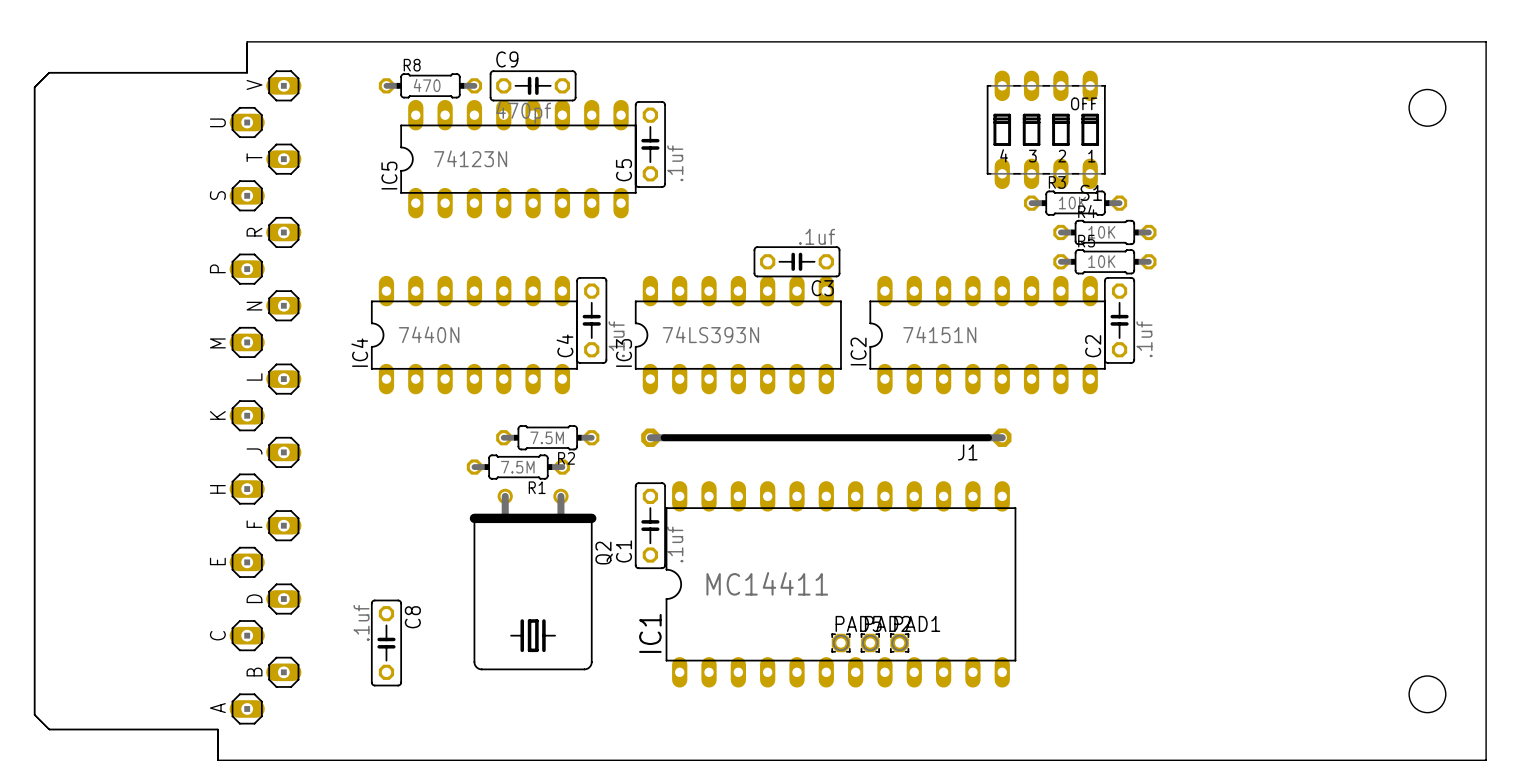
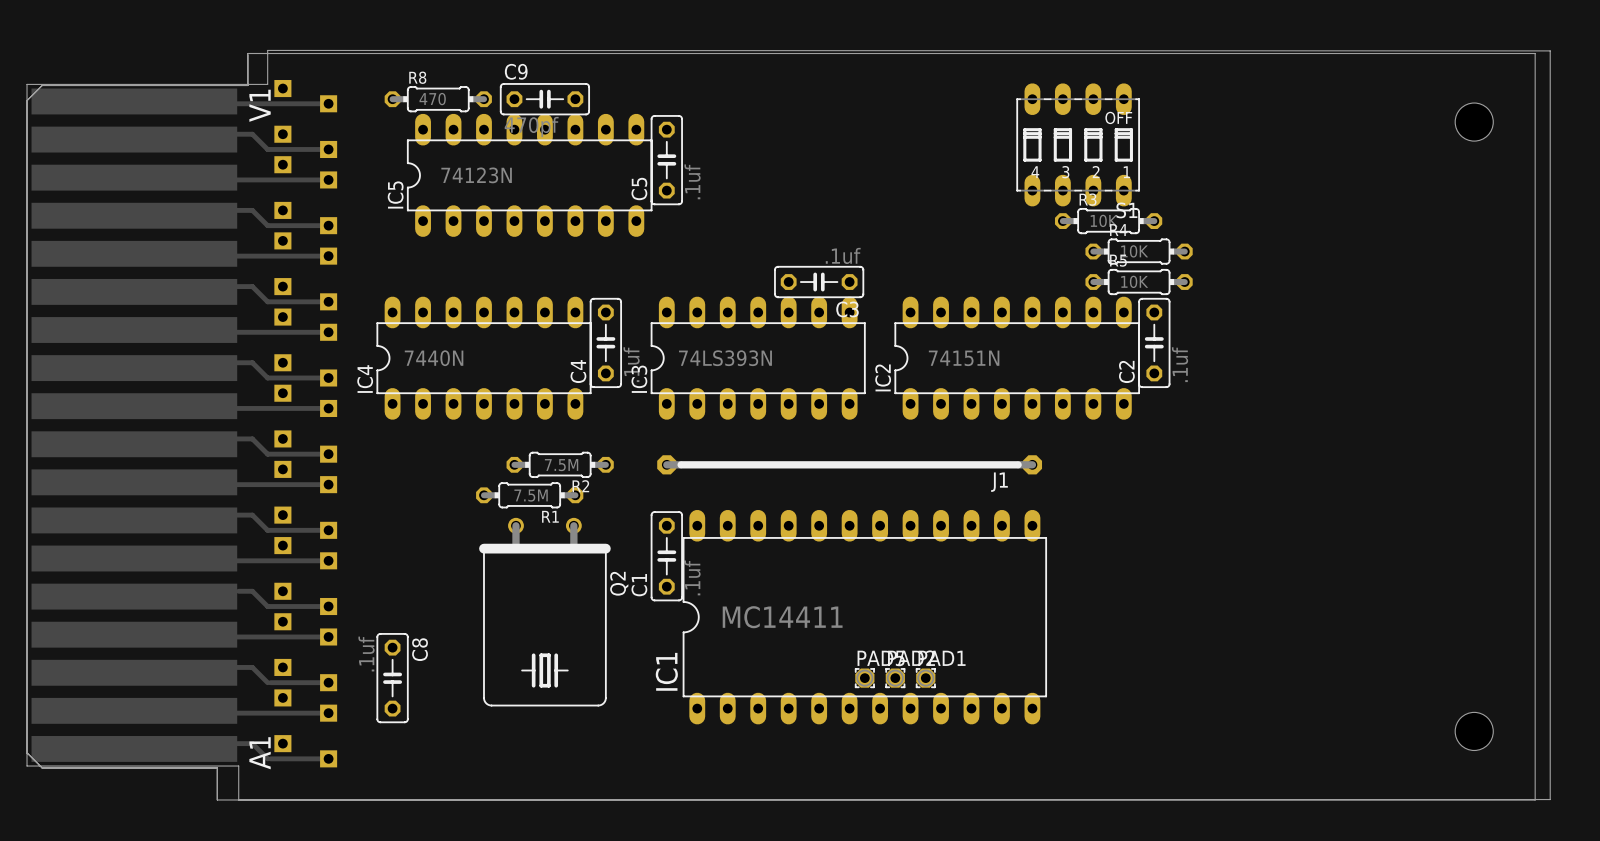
board edge: none -> (267, 50) (1550, 50) (1550, 799) (238, 799) (238, 766) (27, 766) (27, 84) (267, 84) (267, 50)
text: none -> V1 (260, 105)
part: (265, 397) -> none
part: none -> (184, 423)
text: none -> A1 (260, 753)

